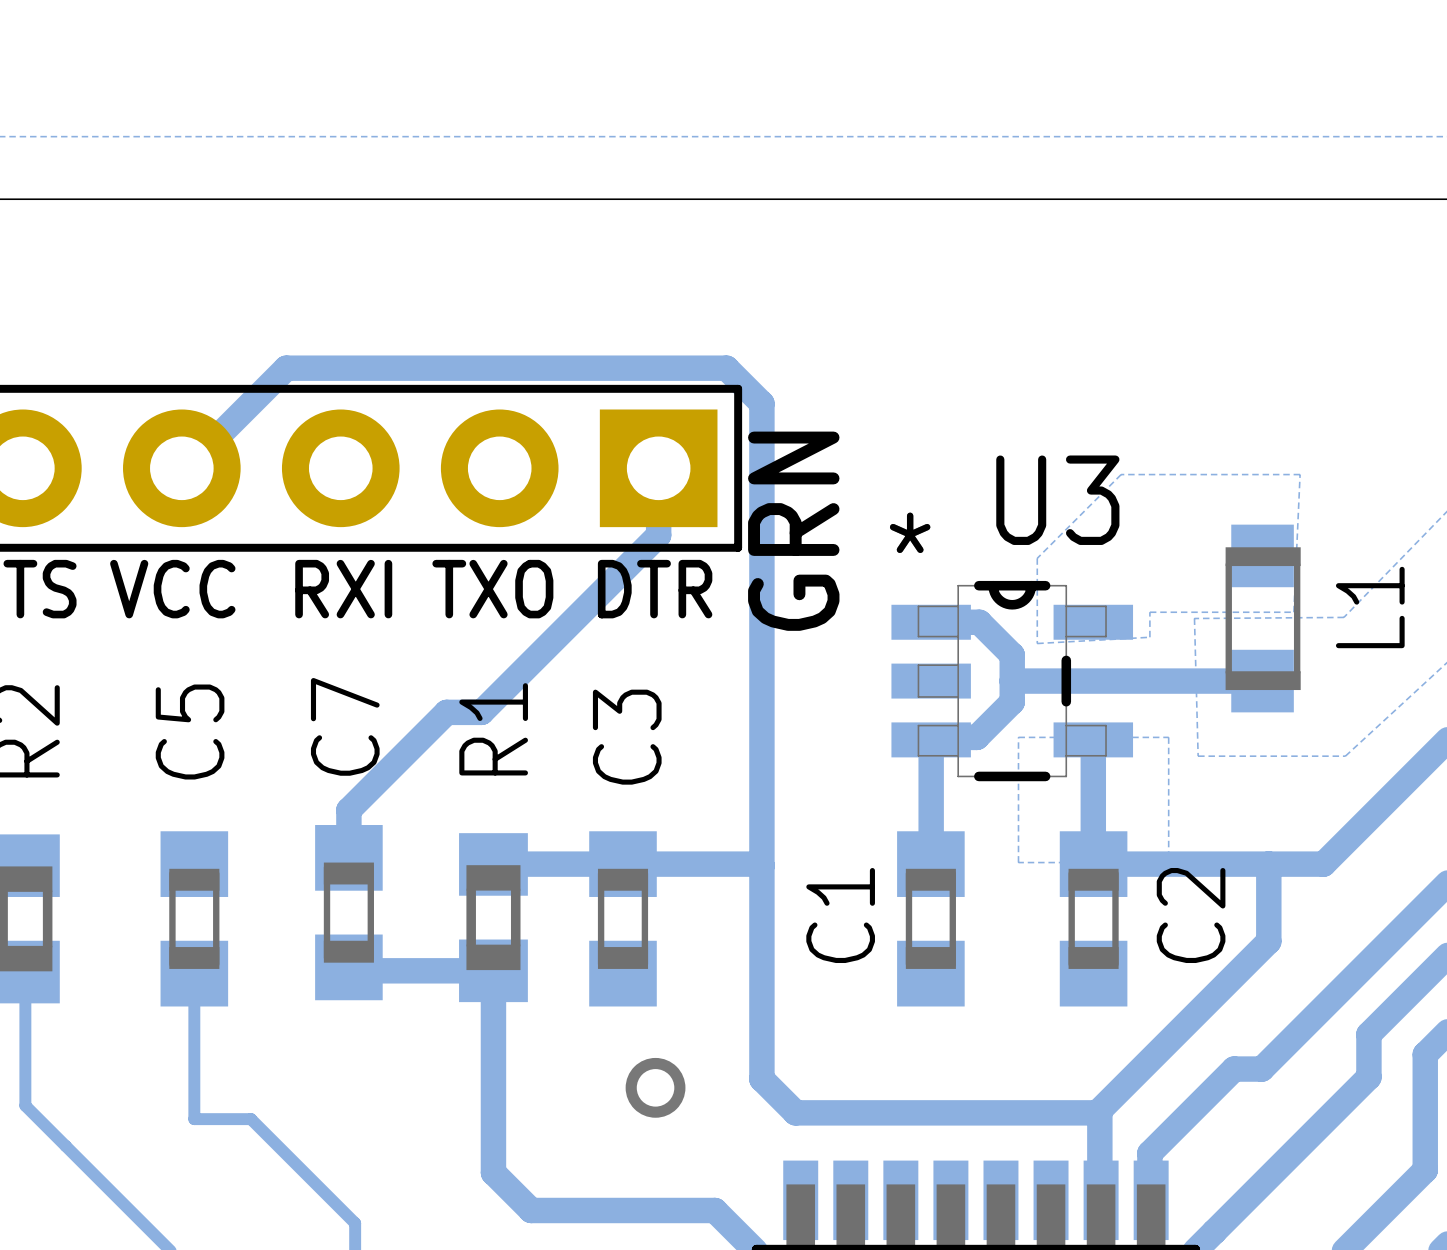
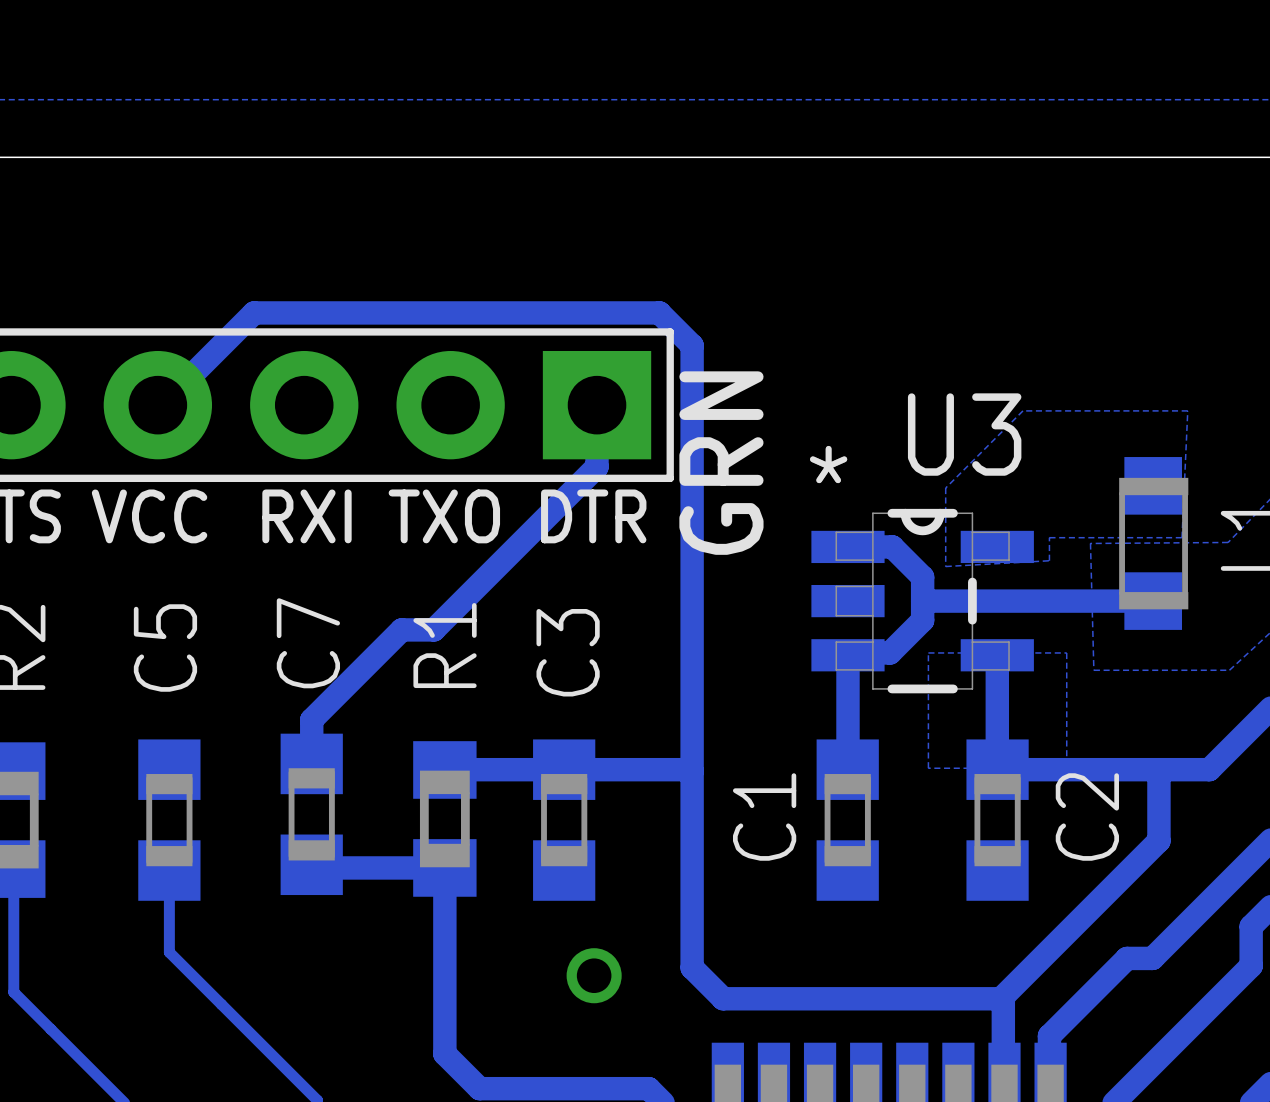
track: (194, 1062) (194, 1119) (251, 1119) -> (169, 952) (221, 1004)

